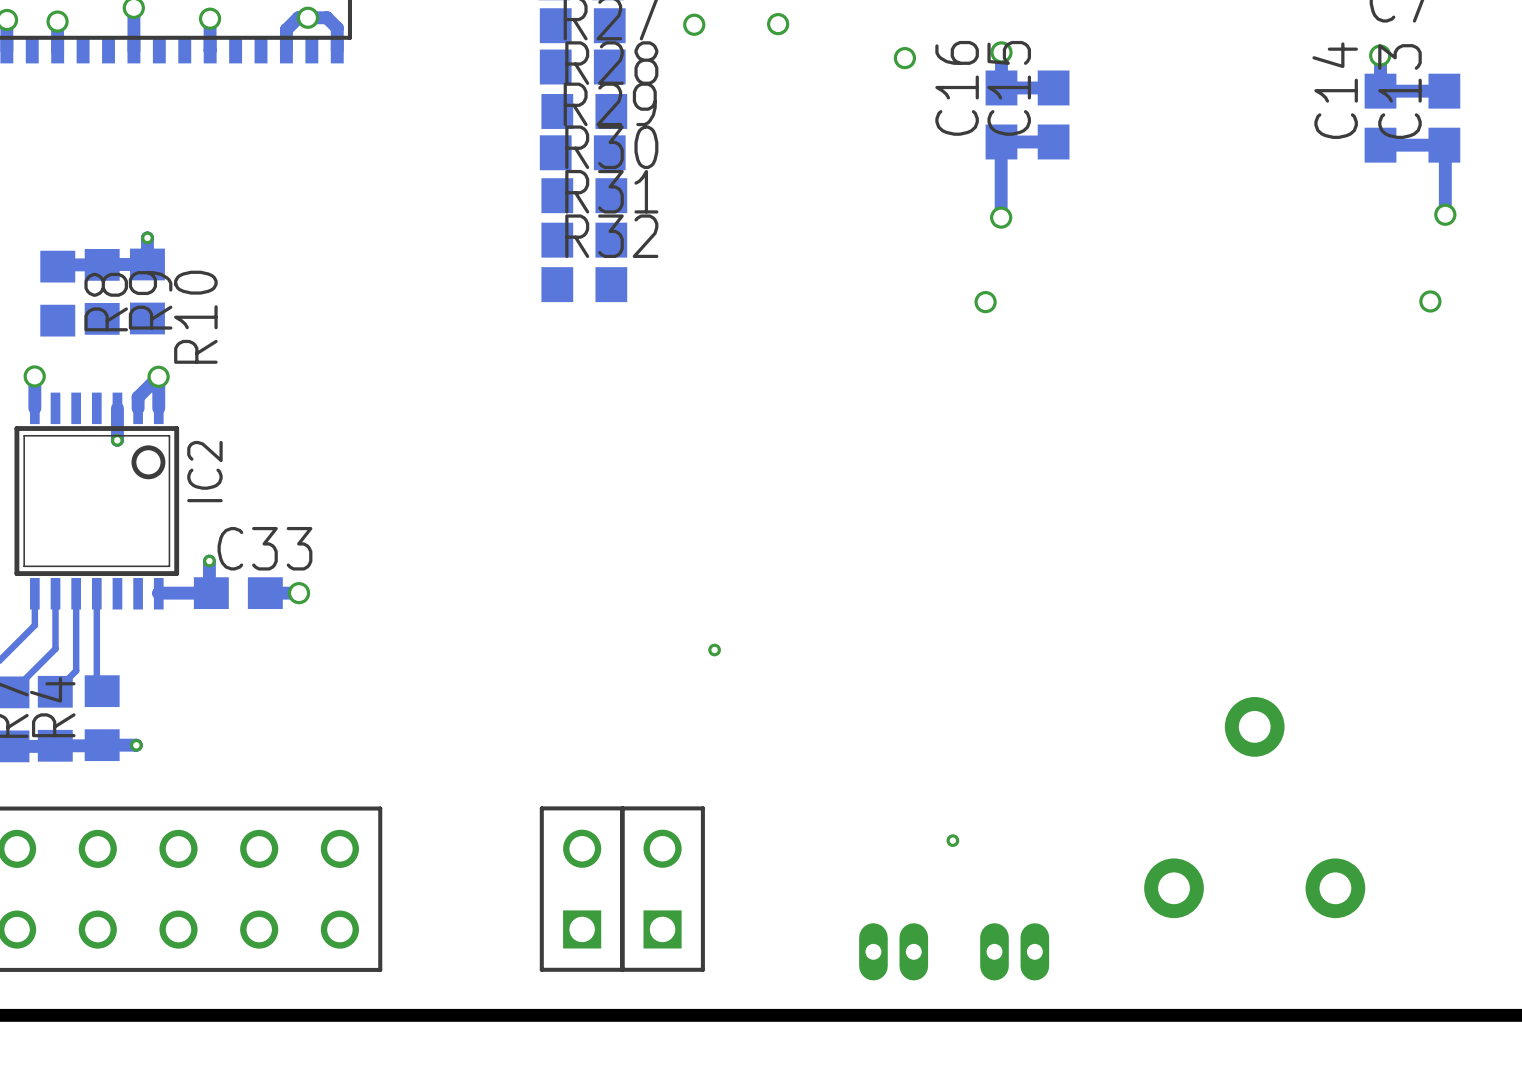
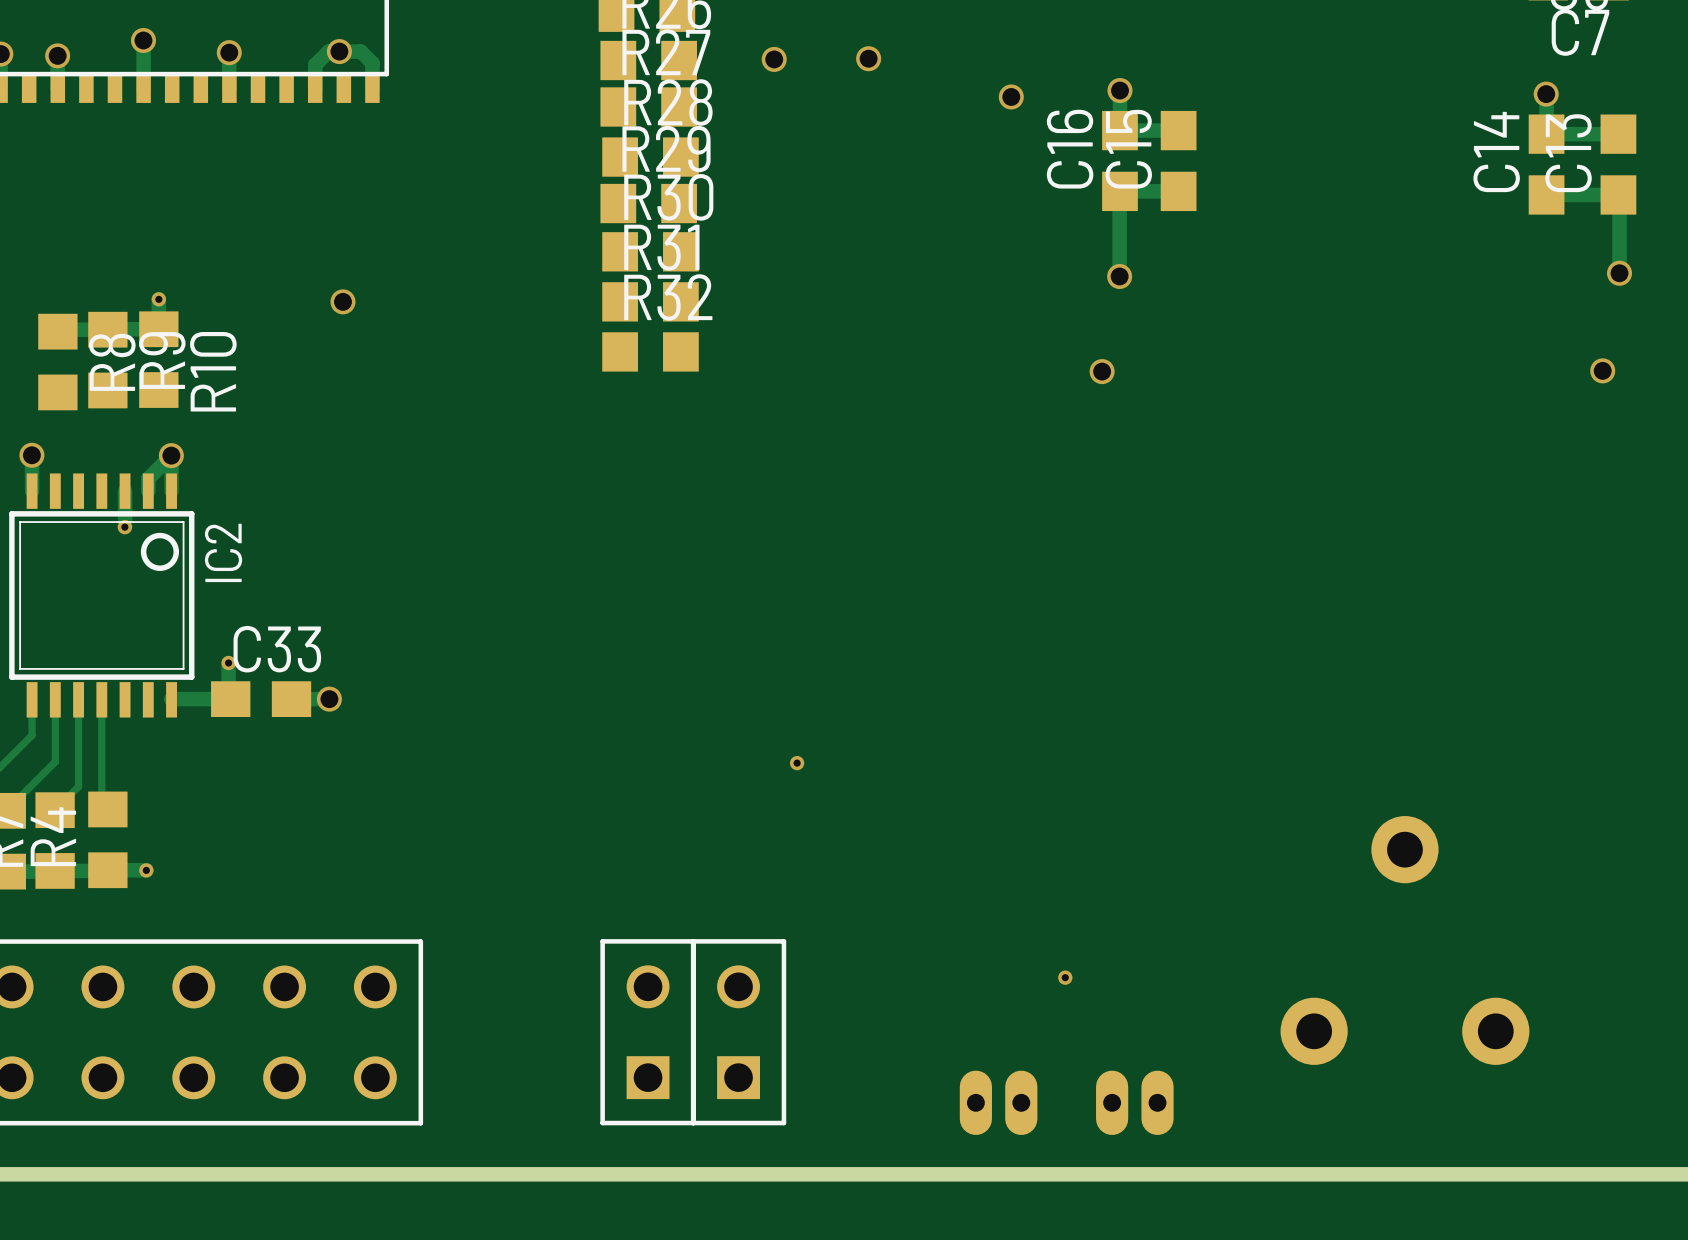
via: none -> (342, 301)

